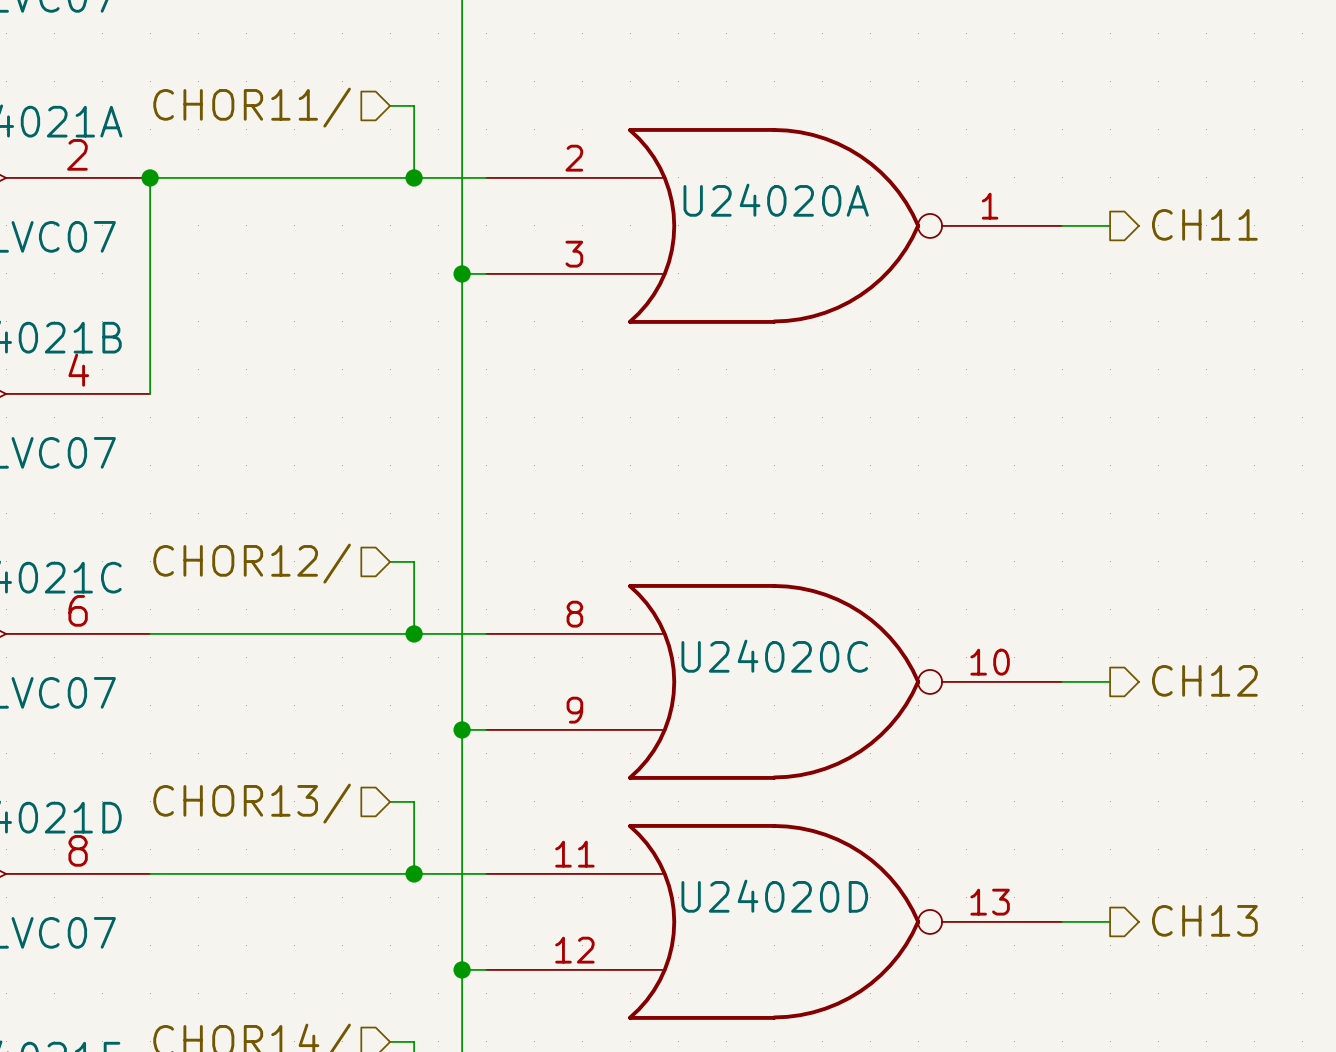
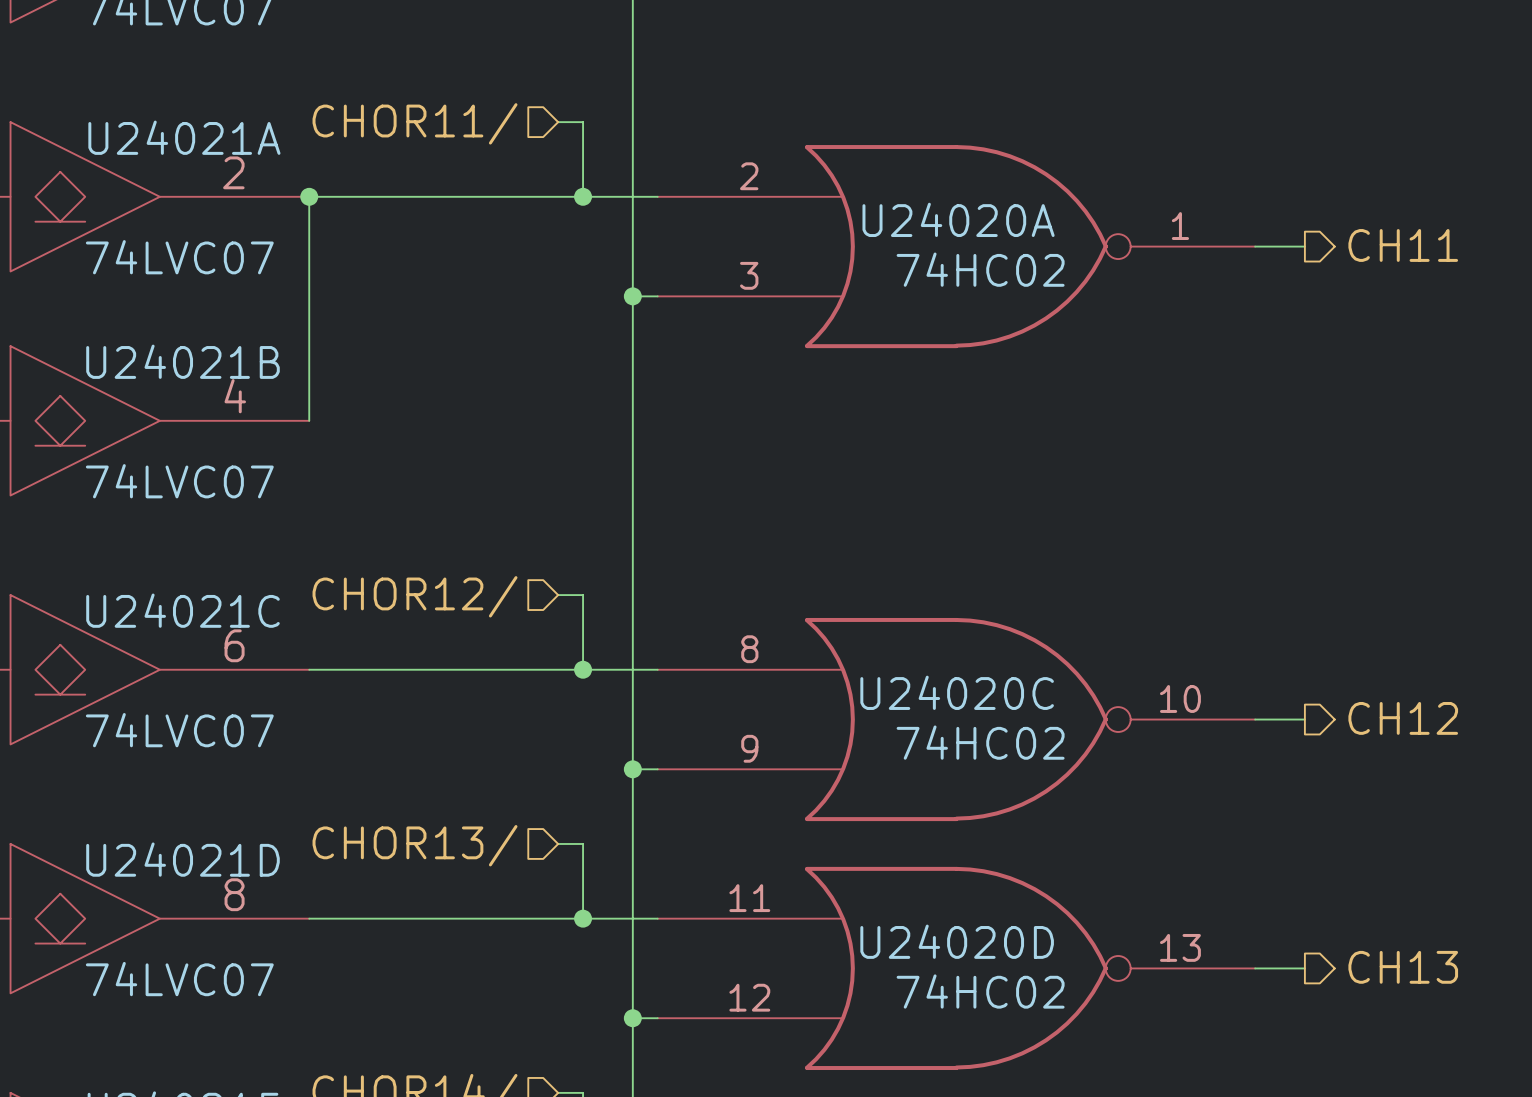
U24020A value: none -> 74HC02 (980, 269)
U24020C value: none -> 74HC02 (980, 742)
U24020D value: none -> 74HC02 (980, 991)

